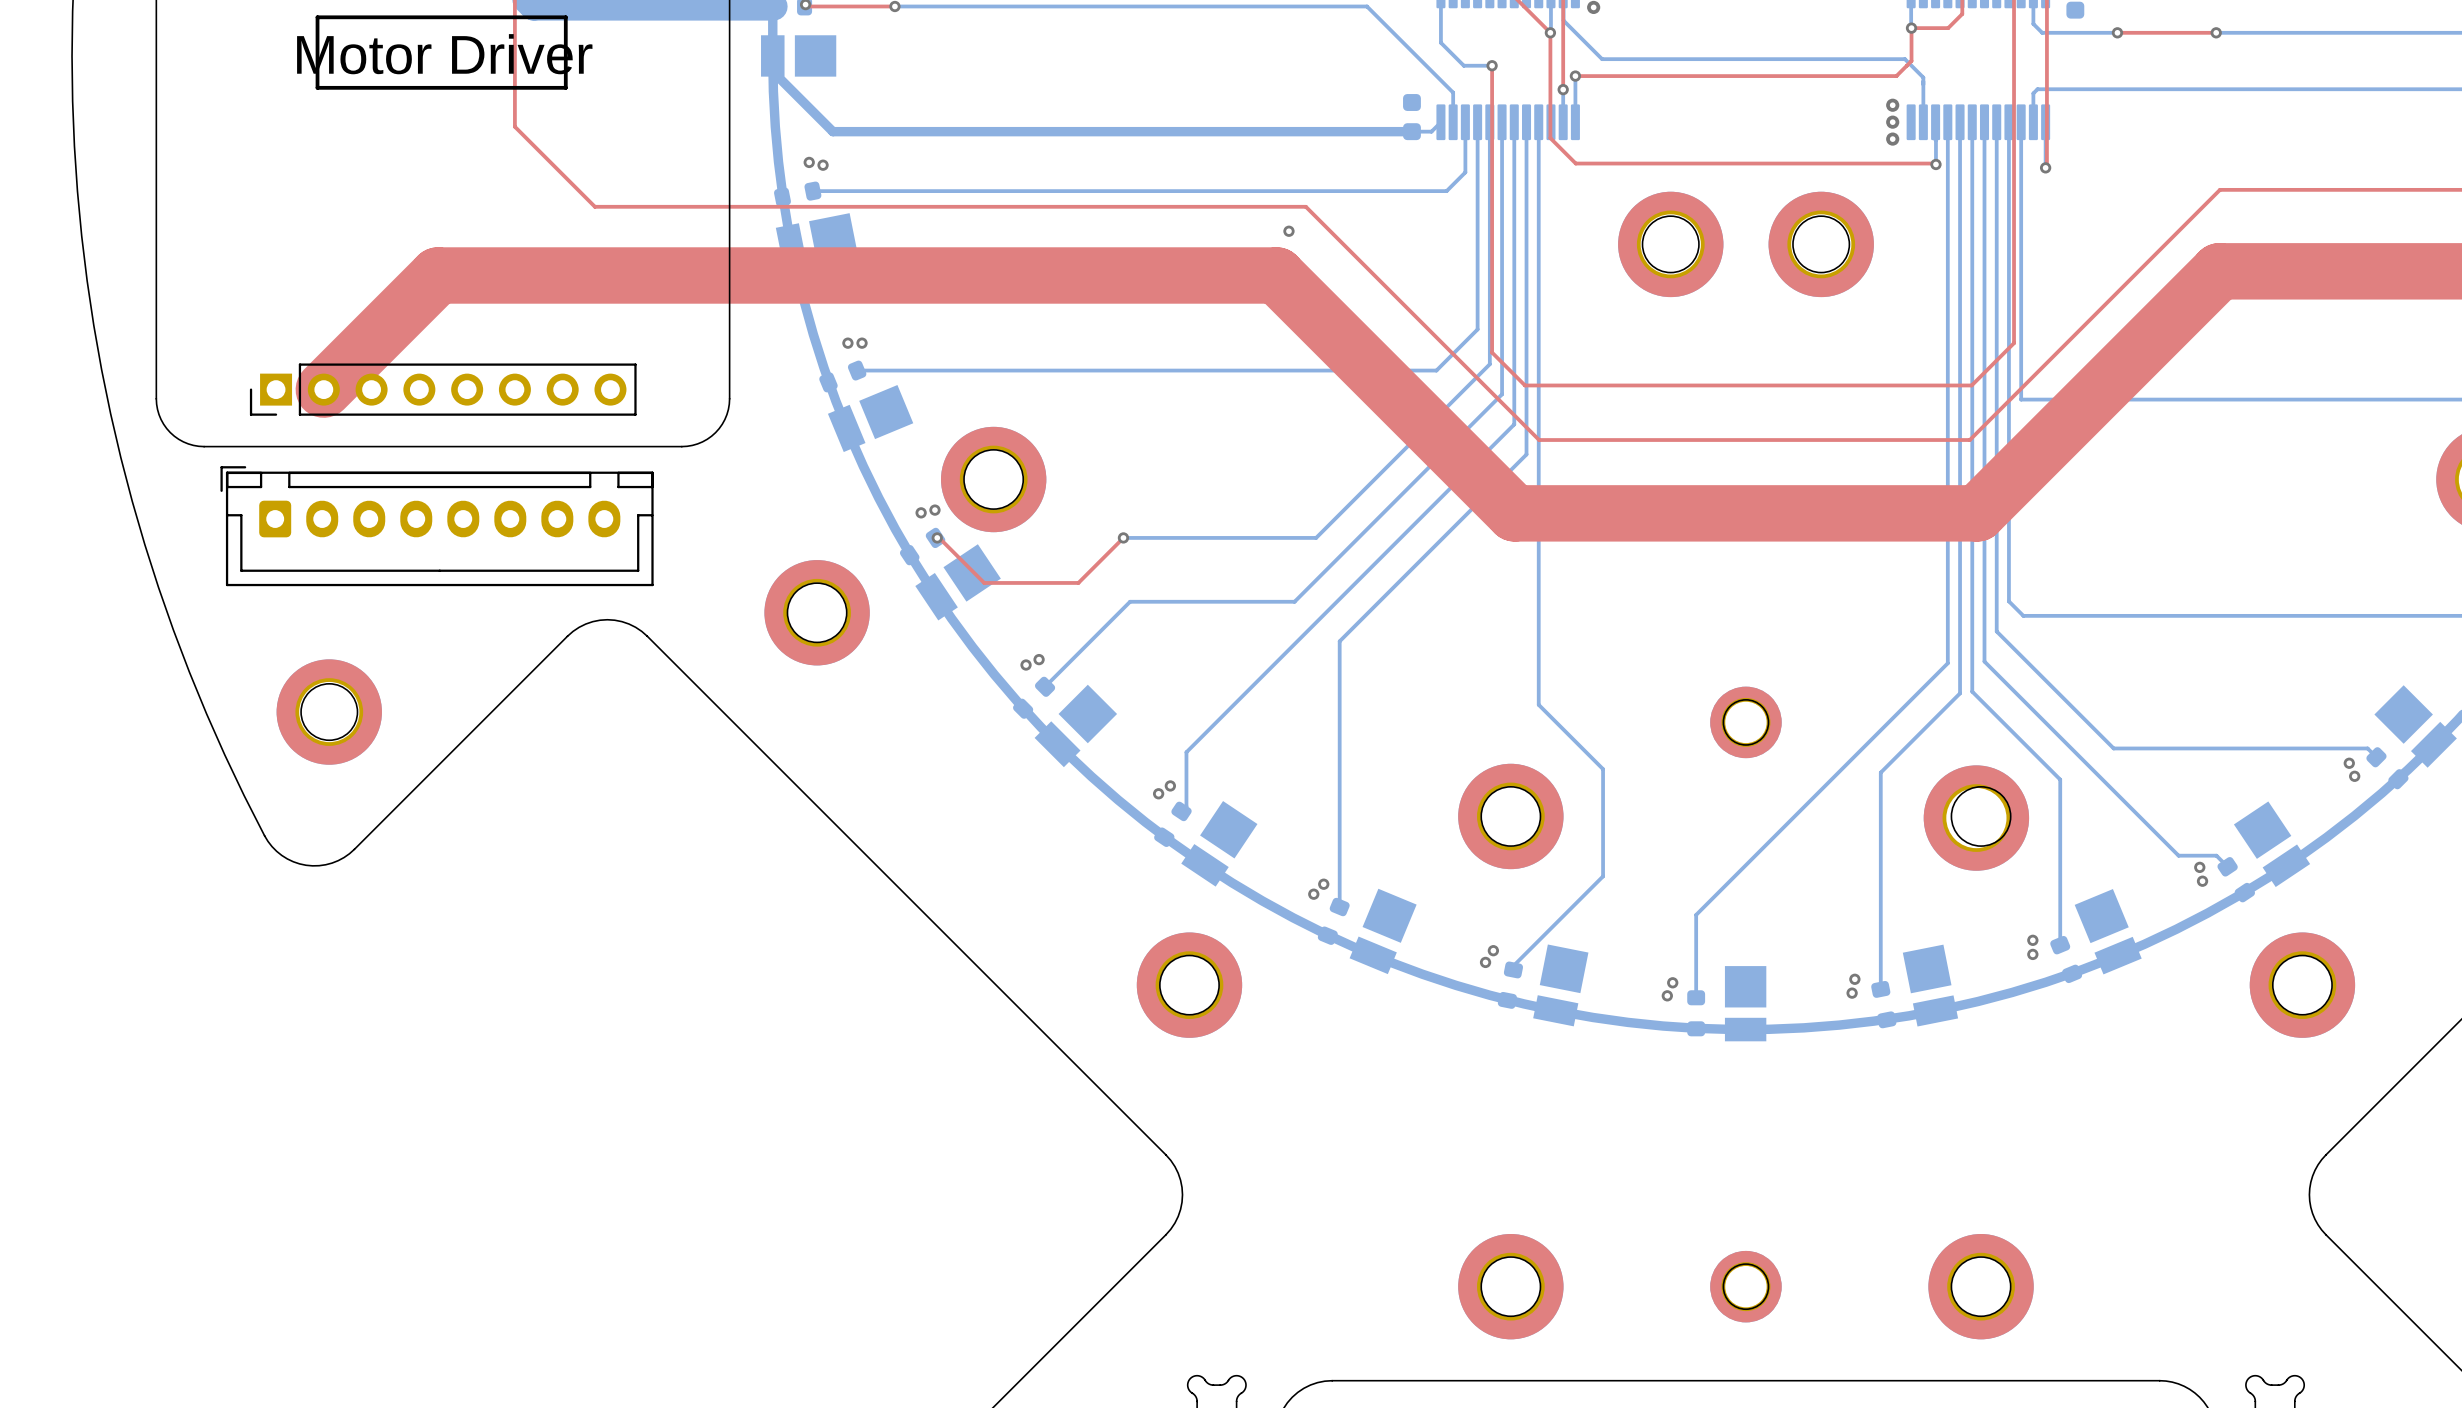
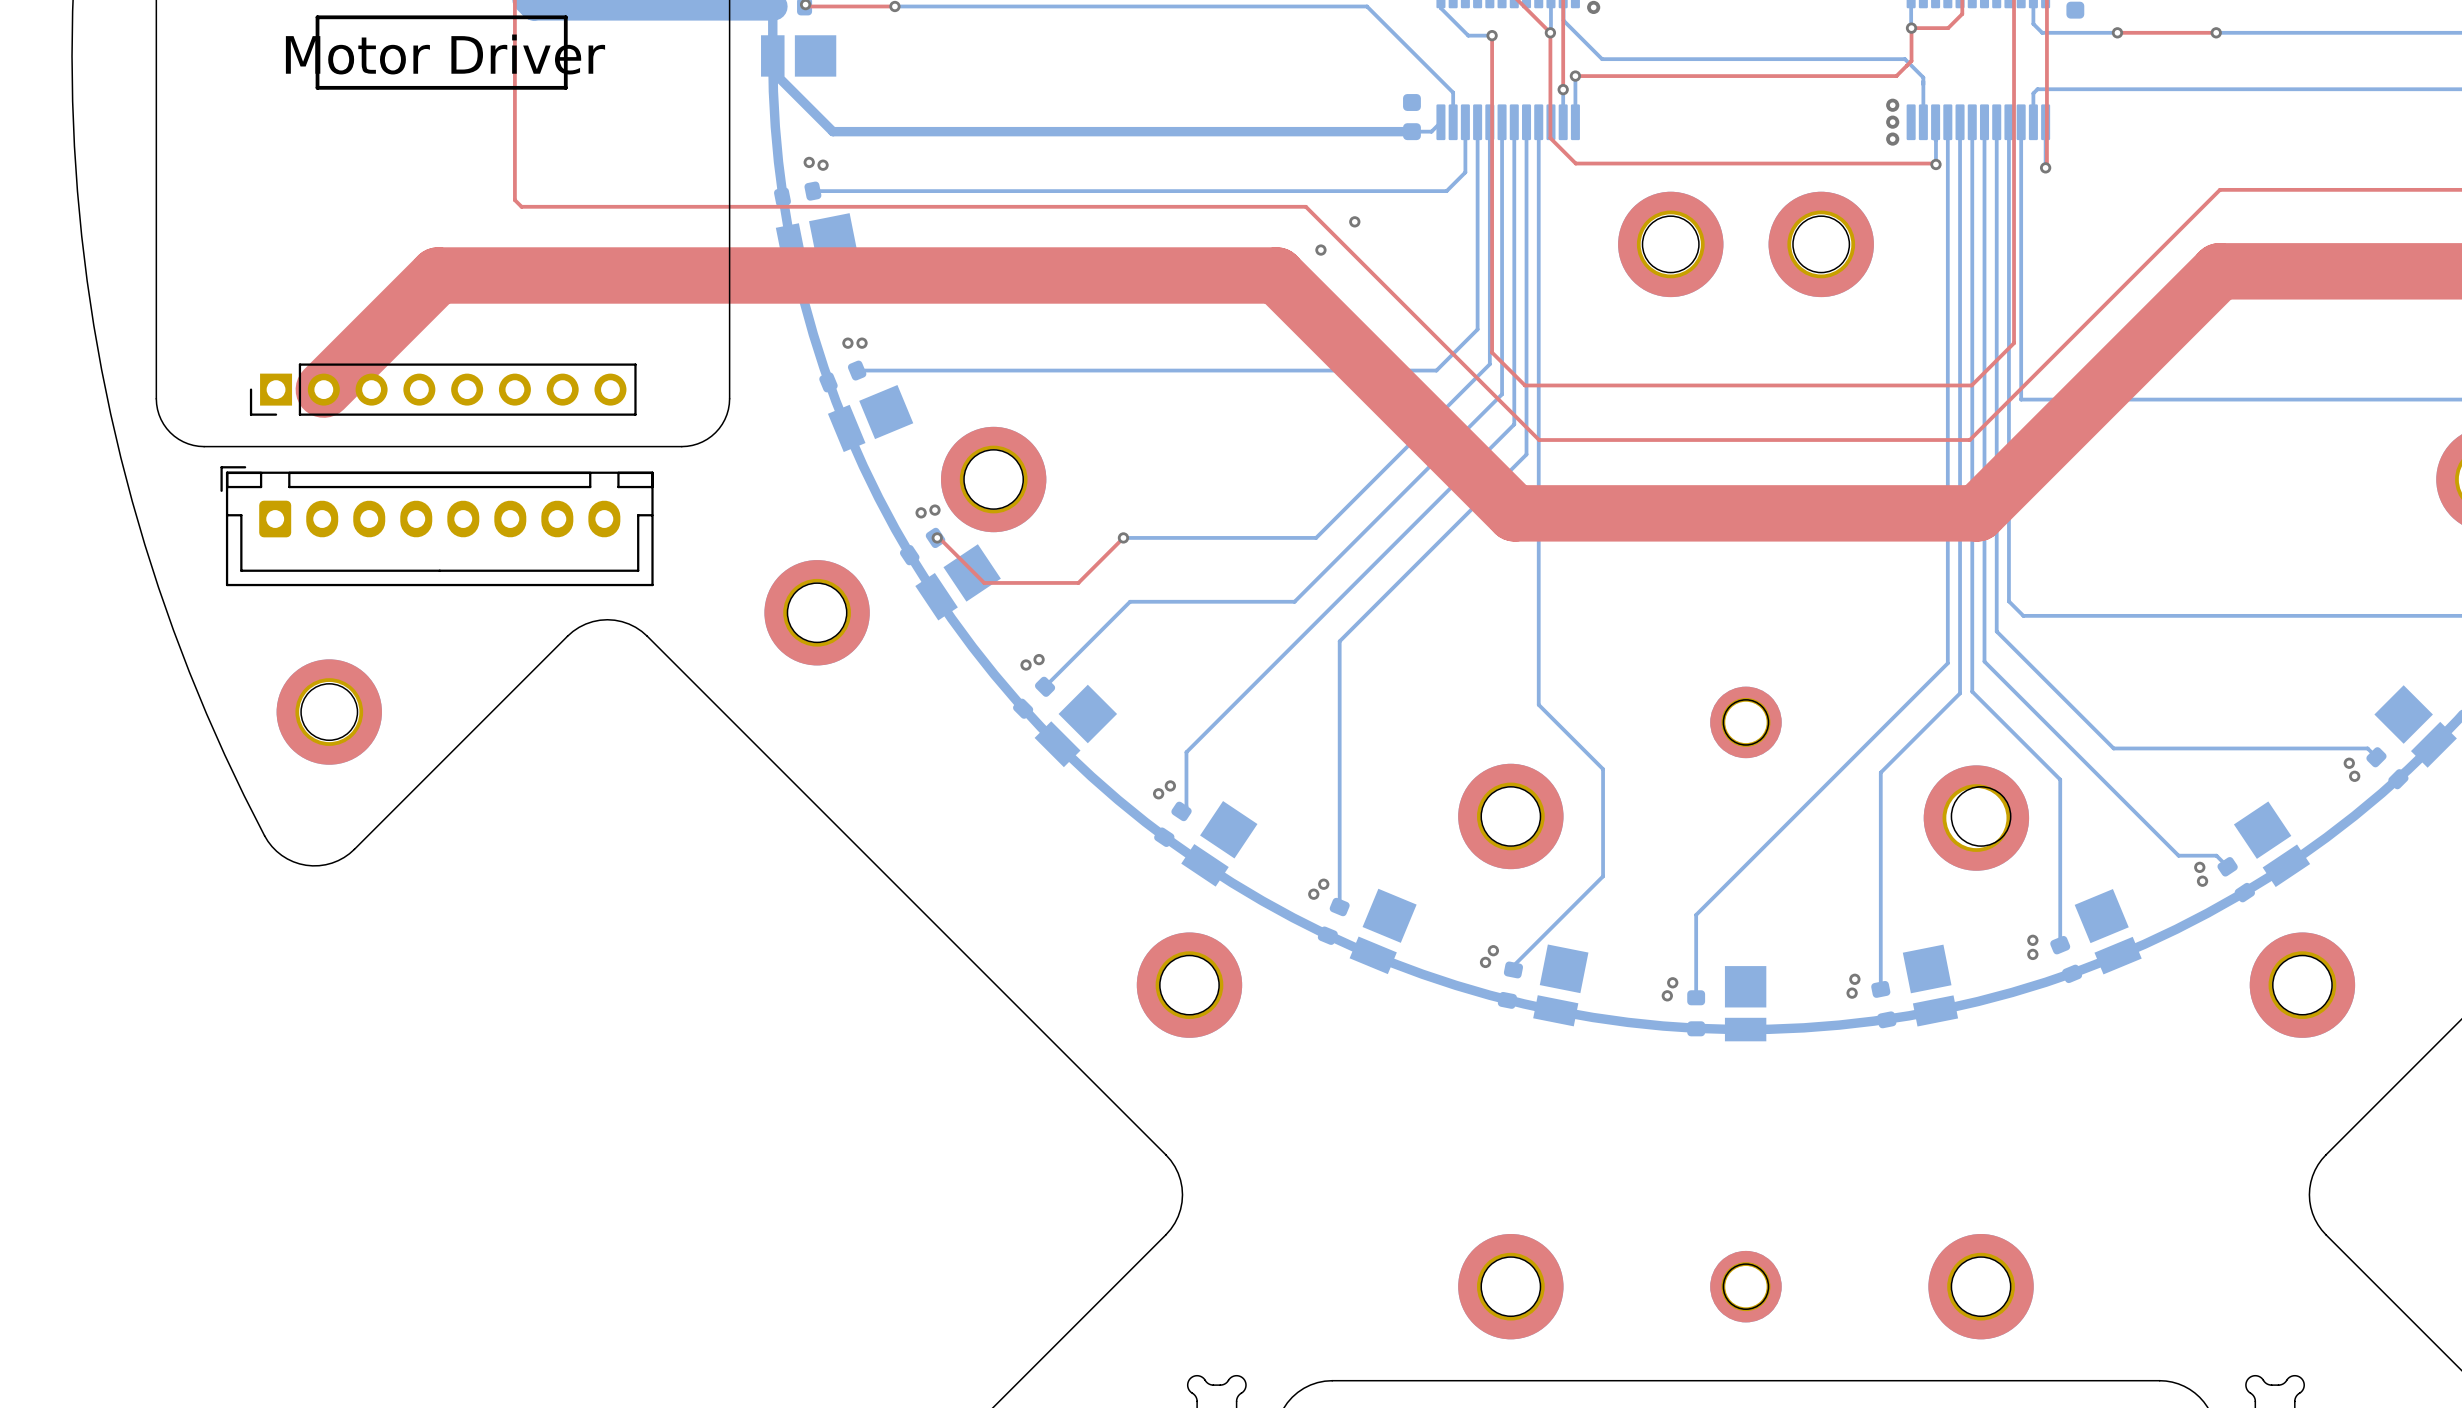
bottom track: (1440, 8) (1440, 42) (1463, 65) (1492, 65) -> (1440, 8) (1468, 35) (1492, 35)
top track: none -> (1492, 35) (1492, 65)
via position: (1492, 65) -> (1492, 35)
top track: (514, 126) (594, 206) -> (514, 126) (514, 200) (521, 206) (594, 206)
via: none -> (1354, 221)
via: (1288, 231) -> none
via: none -> (1320, 250)

